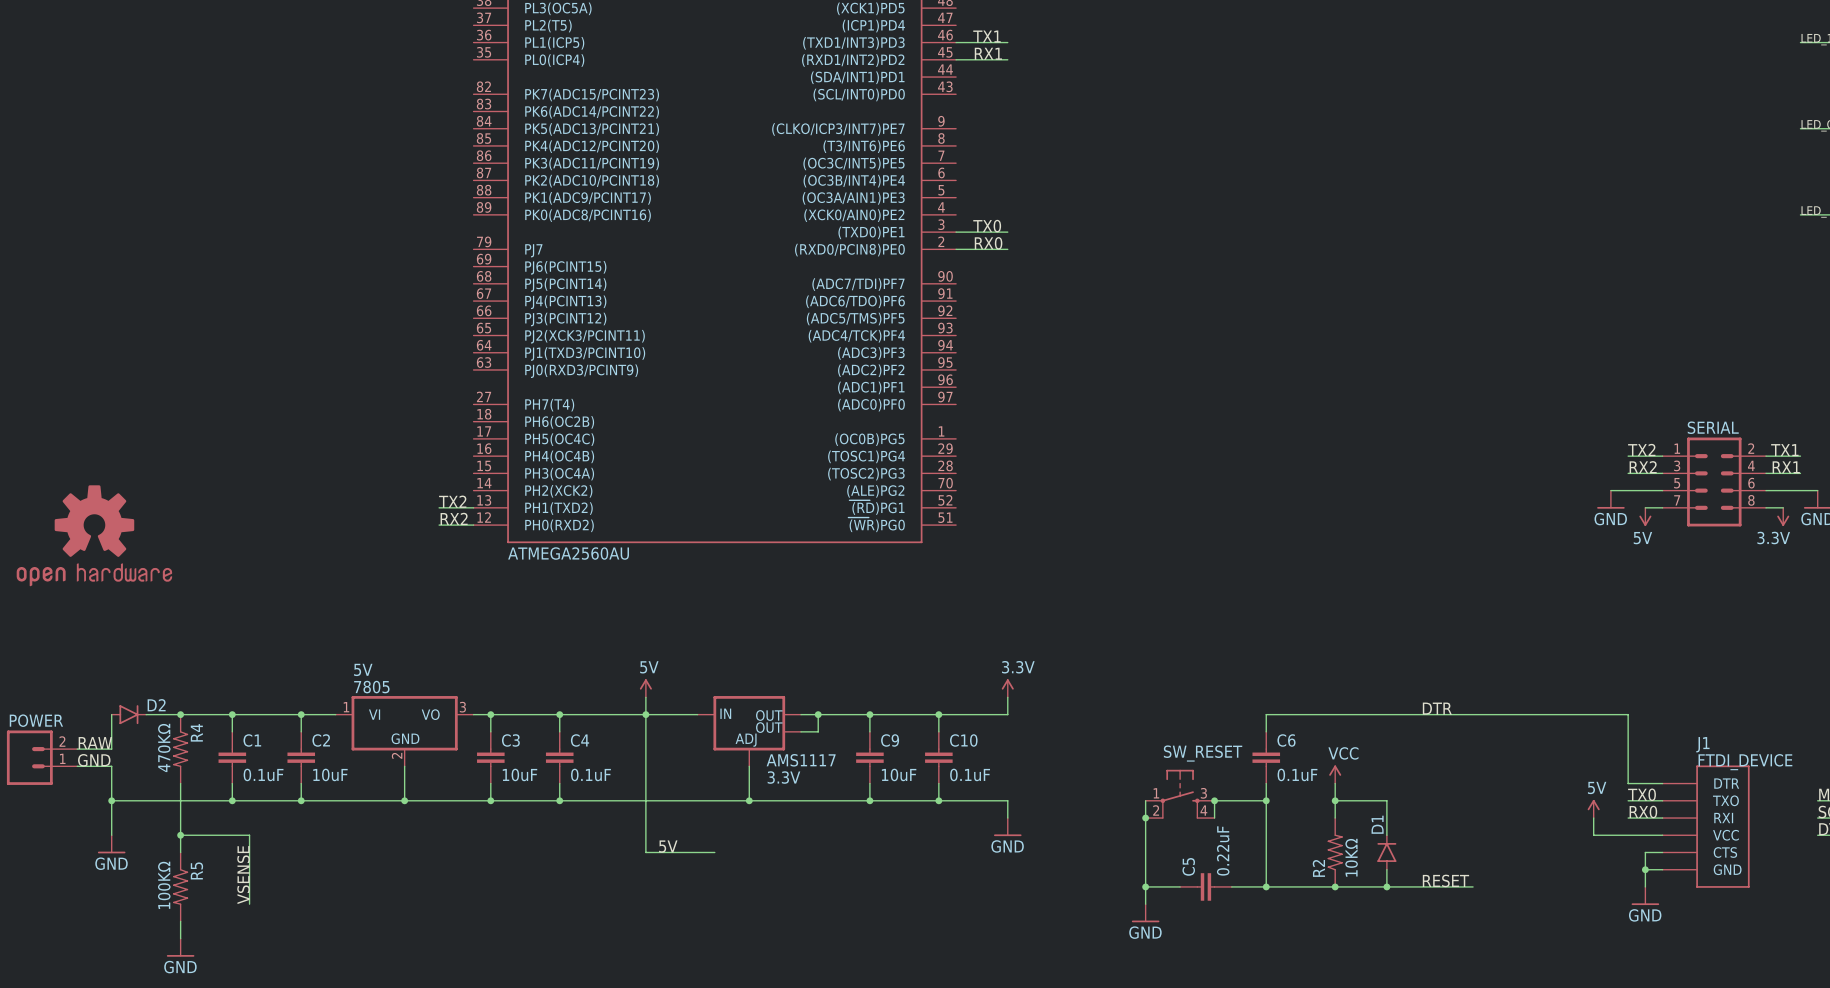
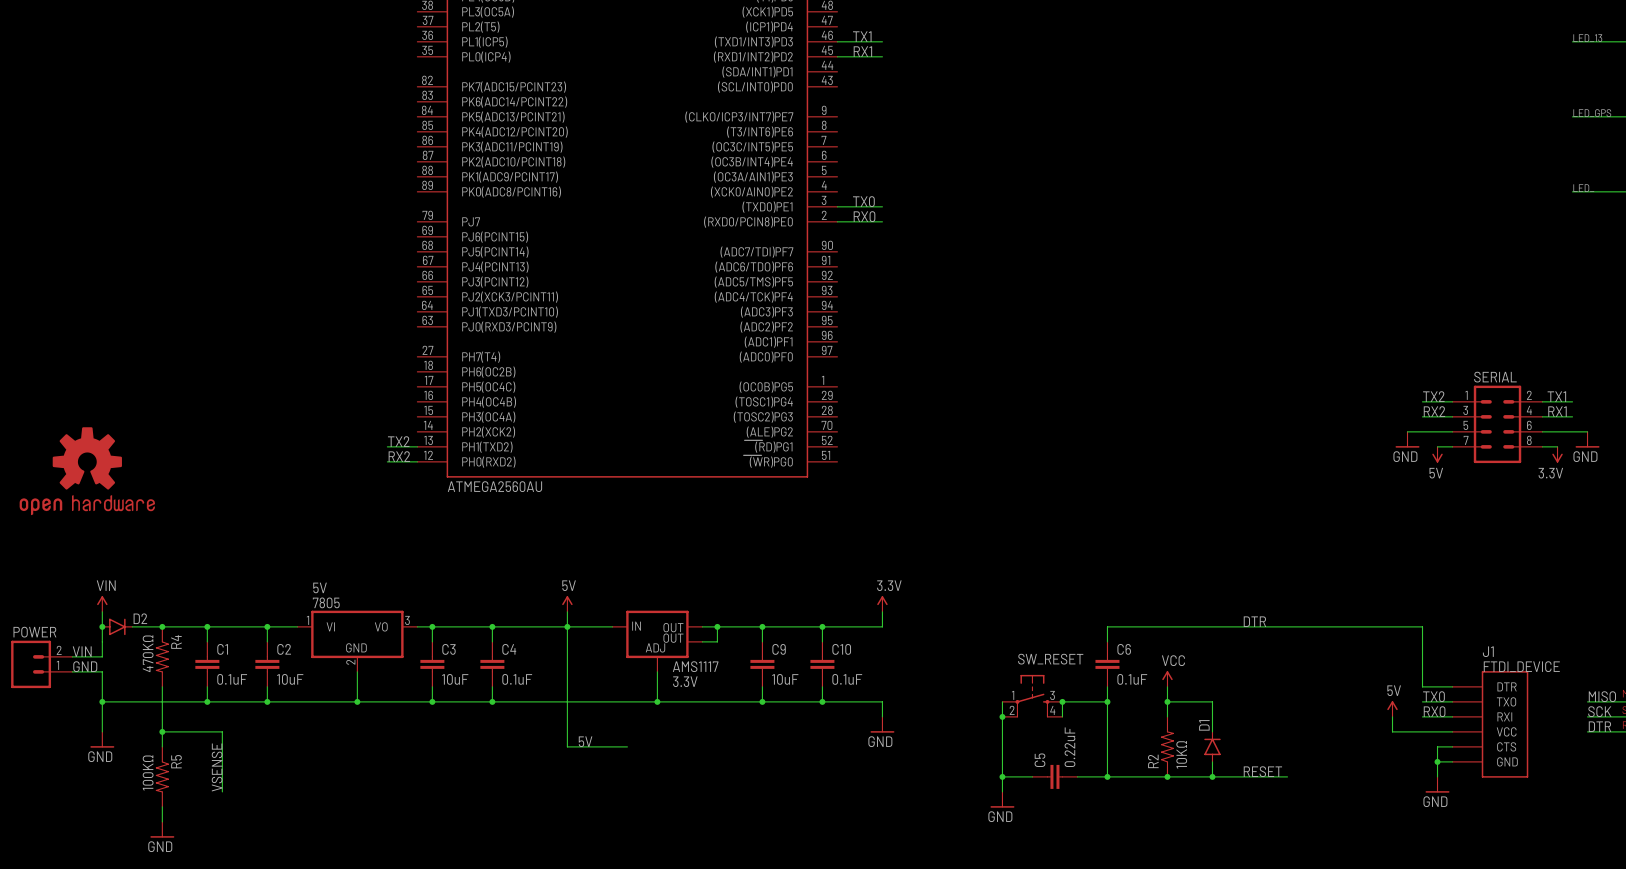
power symbol: none -> VIN (102, 604)
wire: none -> (102, 611) (102, 626)
junction: none -> (102, 626)
label: RAW (95, 743) -> VIN (82, 651)

